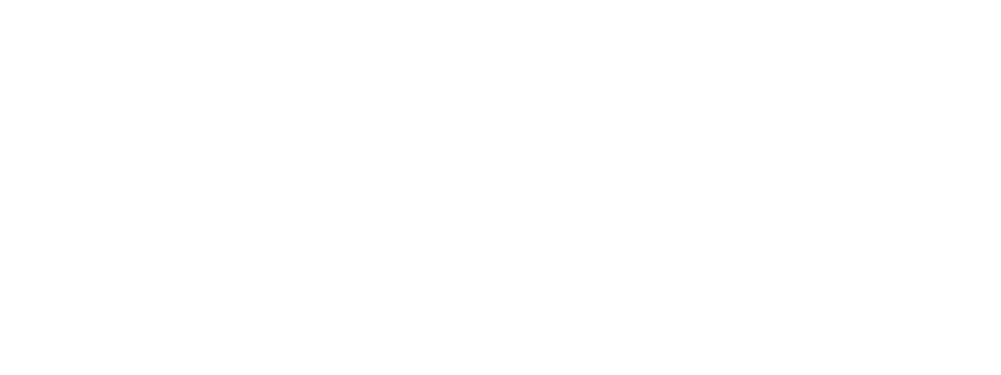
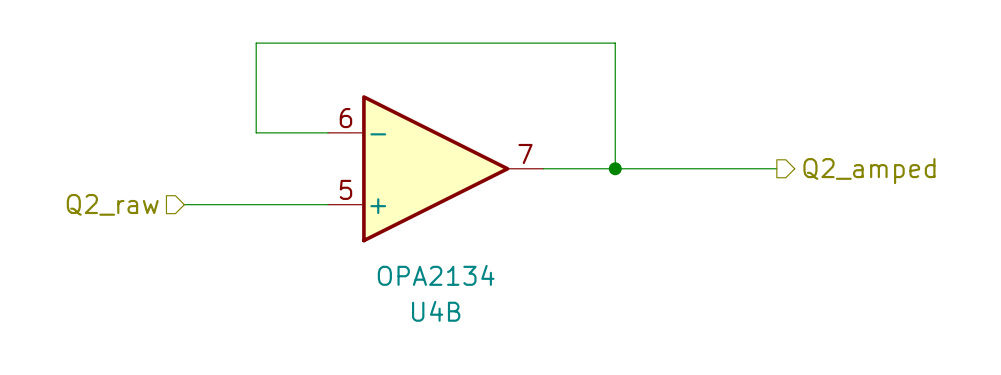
wire: none -> (328, 132) (256, 132) (256, 43) (615, 43) (615, 168)
U4B: none -> OPA2134 (435, 168)
wire: none -> (543, 168) (776, 168)
junction: none -> (615, 168)
hierarchical label: none -> Q2_amped (869, 171)
hierarchical label: none -> Q2_raw (112, 204)
wire: none -> (184, 204) (328, 204)

